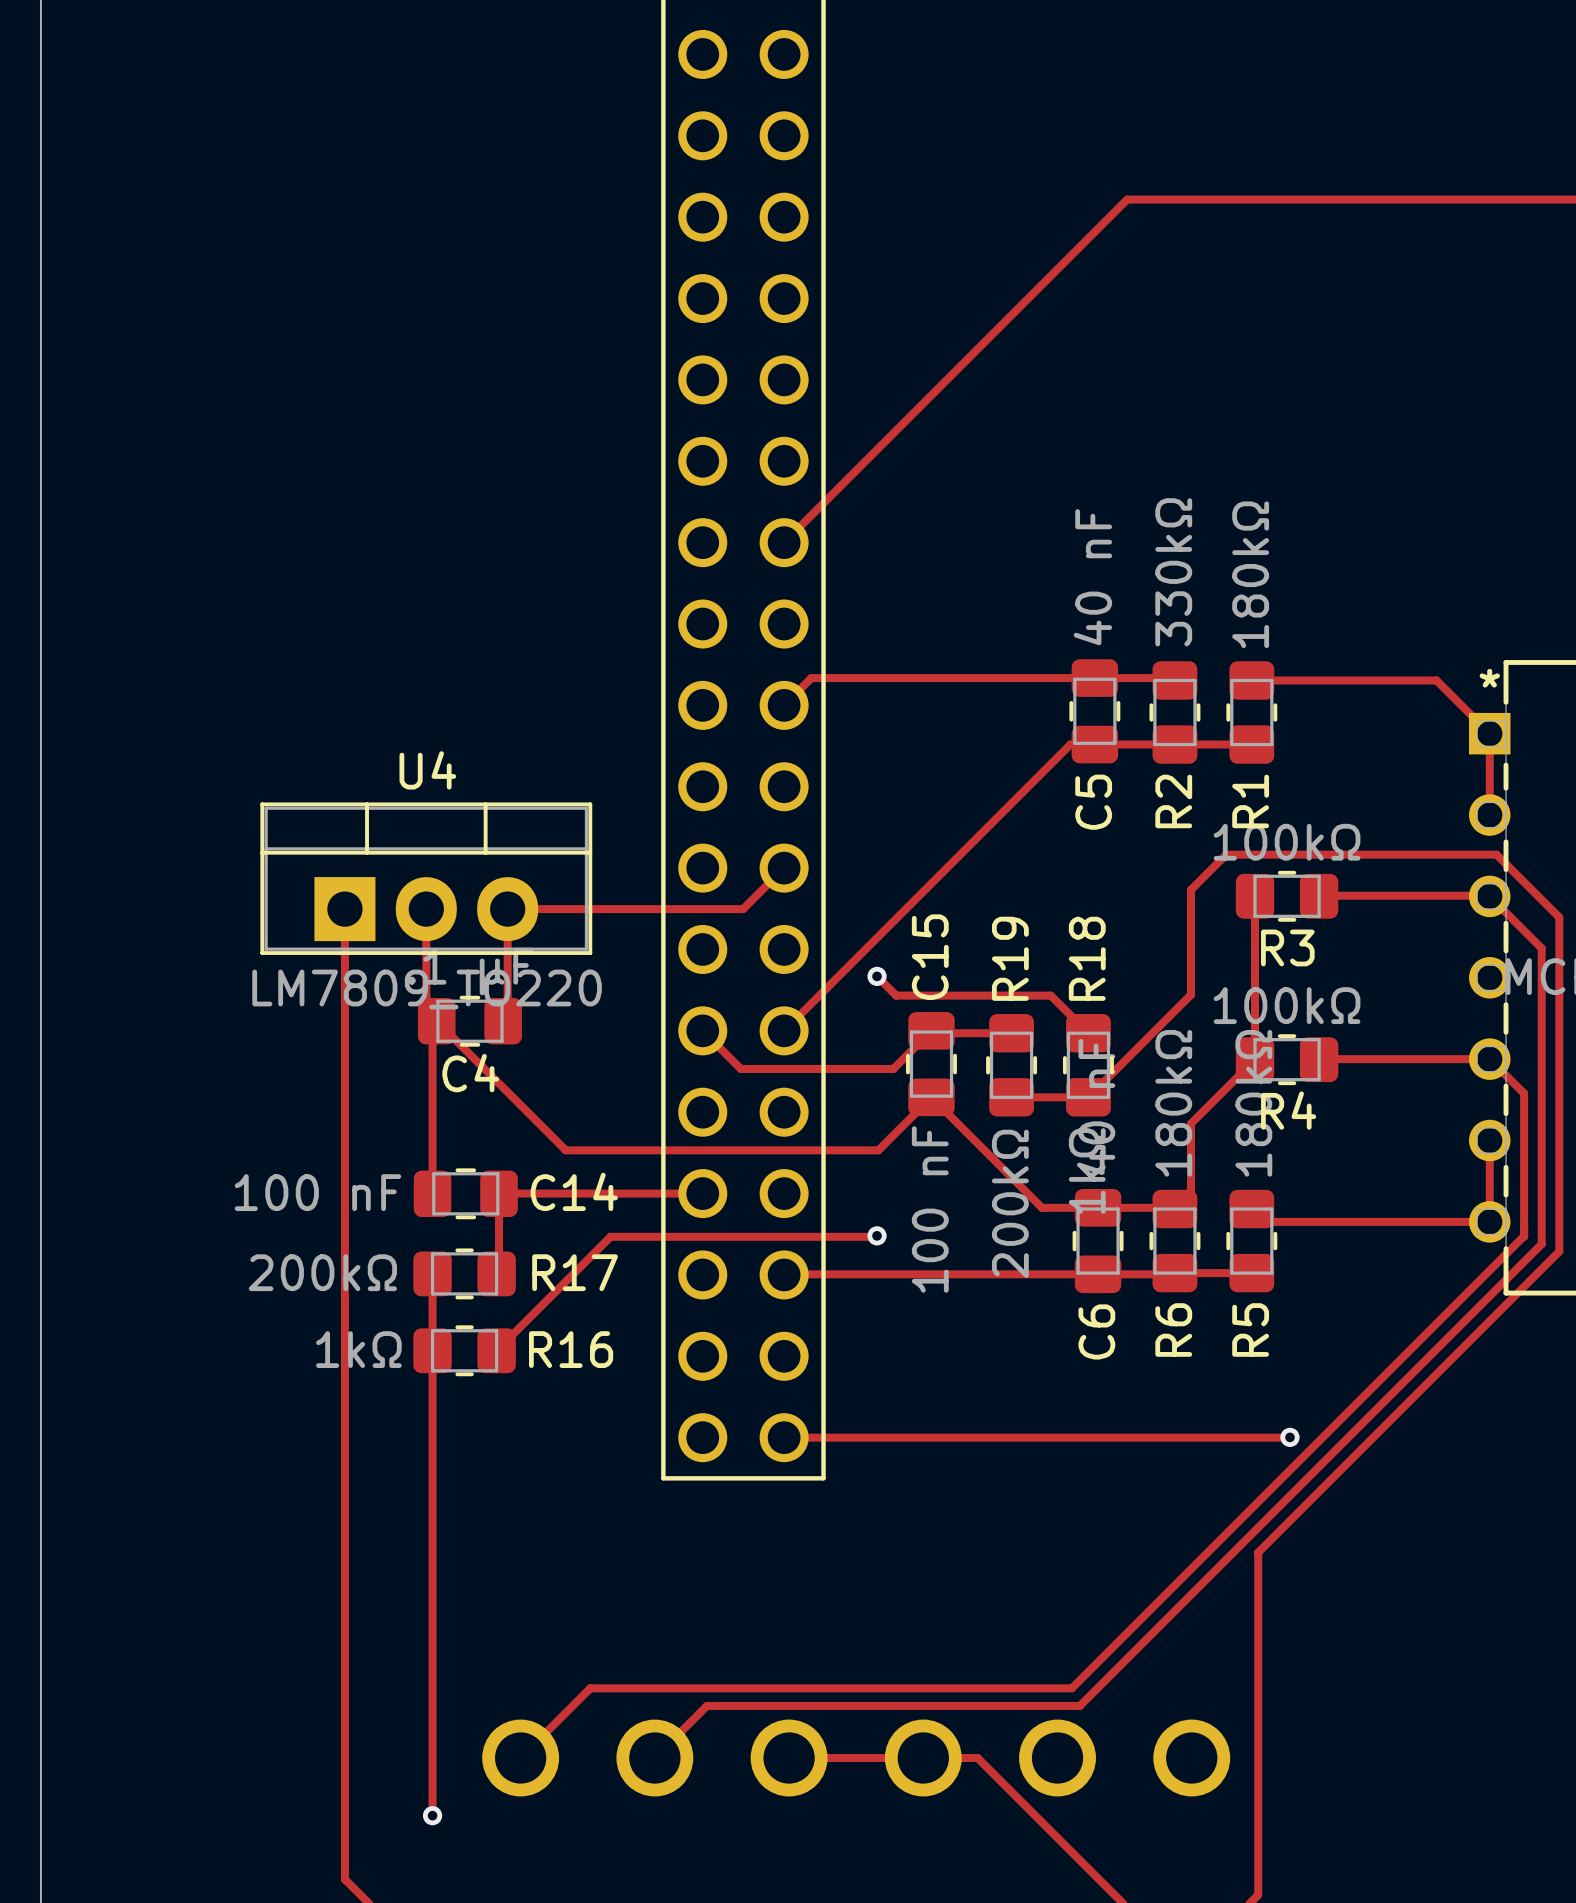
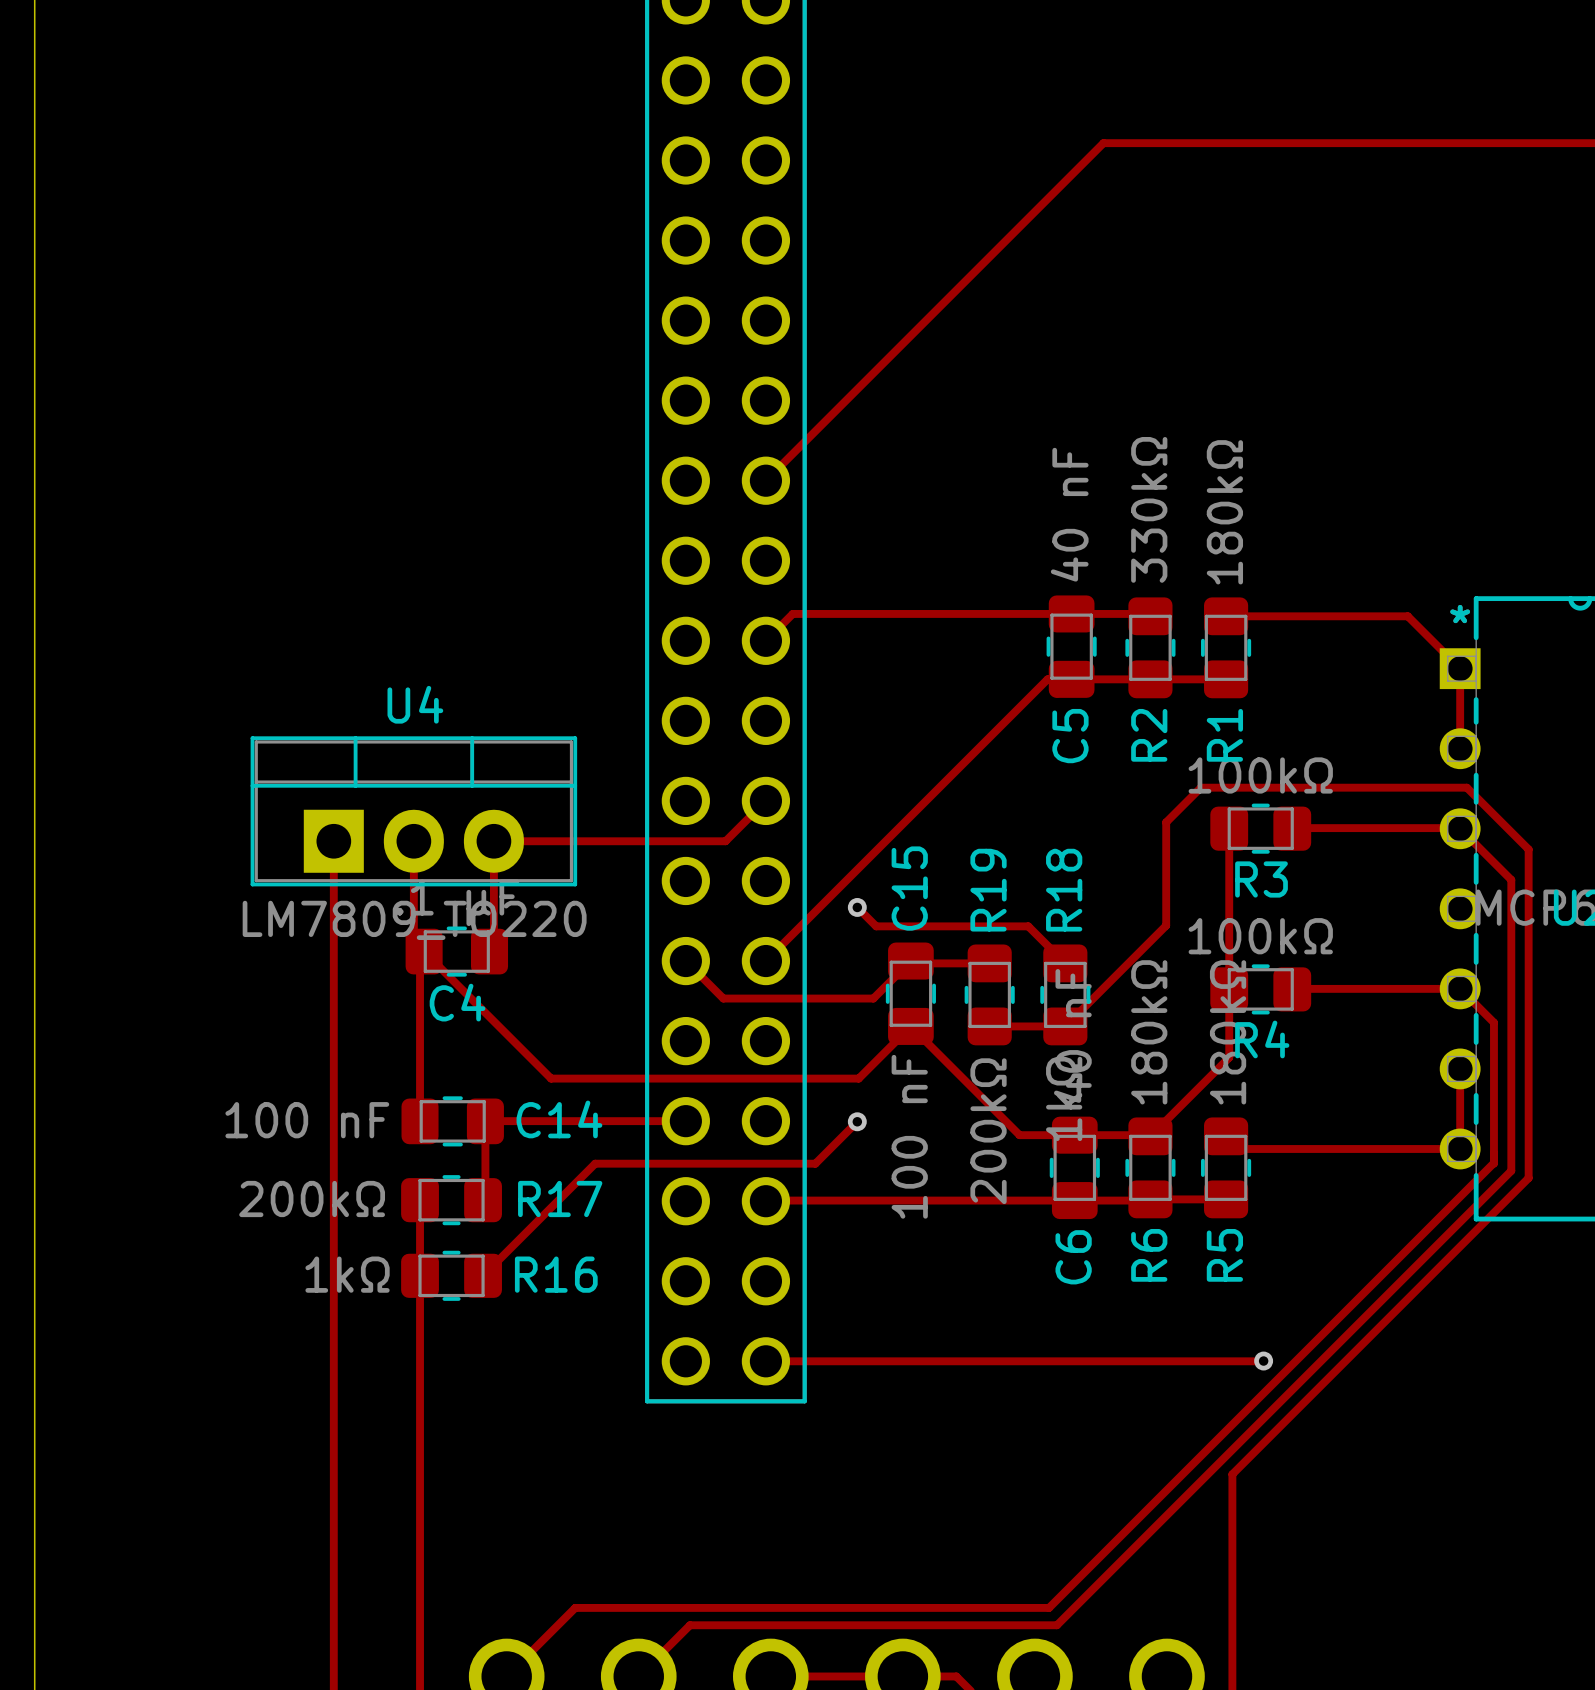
track: (1255, 1059) (1190, 1123) (1190, 1193) -> (1229, 989) (1229, 1057) (1166, 1120)
track: (877, 1235) (834, 1236) -> (857, 1121) (815, 1163)
via position: (877, 1235) -> (857, 1121)

